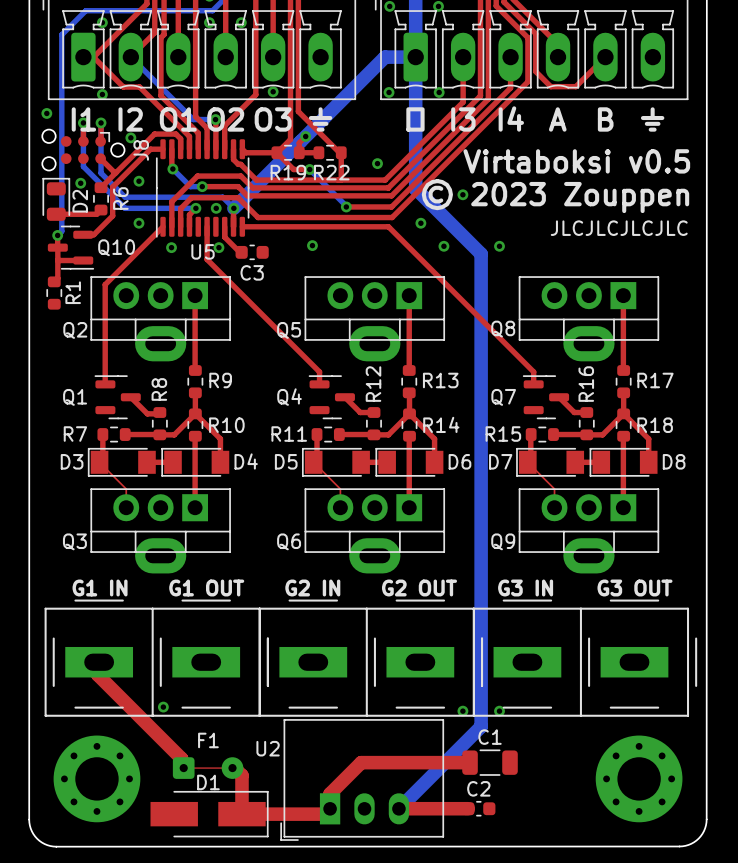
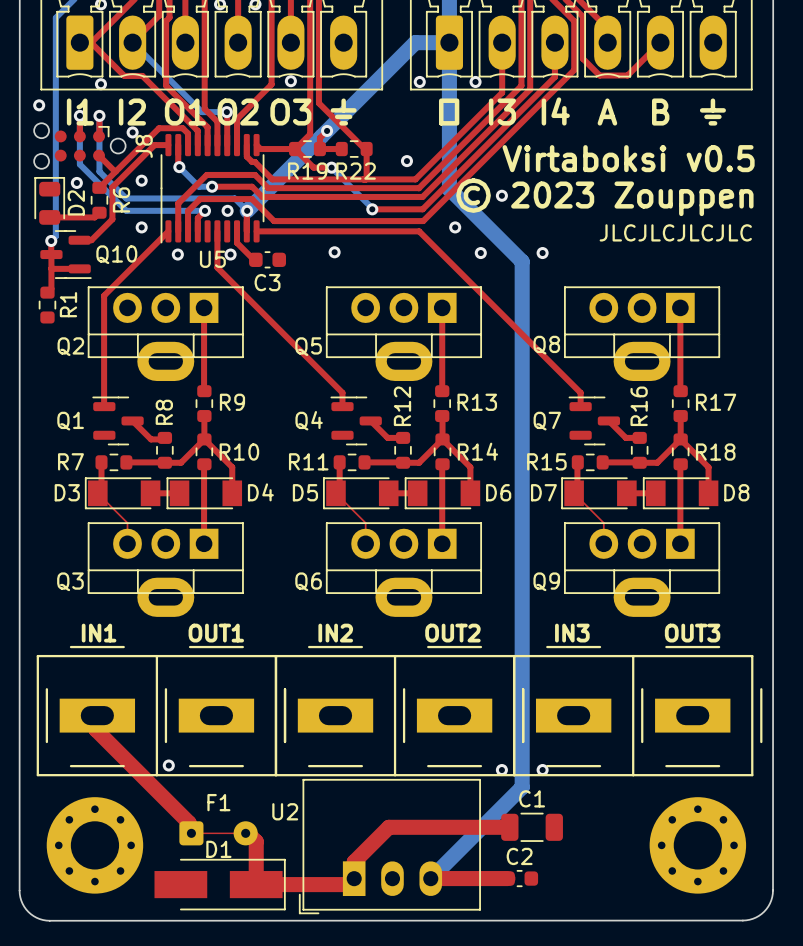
text: G1 IN (100, 587) -> IN1 (99, 633)
text: G1 OUT (206, 587) -> OUT1 (216, 633)
text: G2 IN (312, 587) -> IN2 (335, 633)
text: G2 OUT (419, 587) -> OUT2 (452, 633)
text: G3 IN (525, 587) -> IN3 (572, 633)
text: G3 OUT (634, 587) -> OUT3 (692, 633)

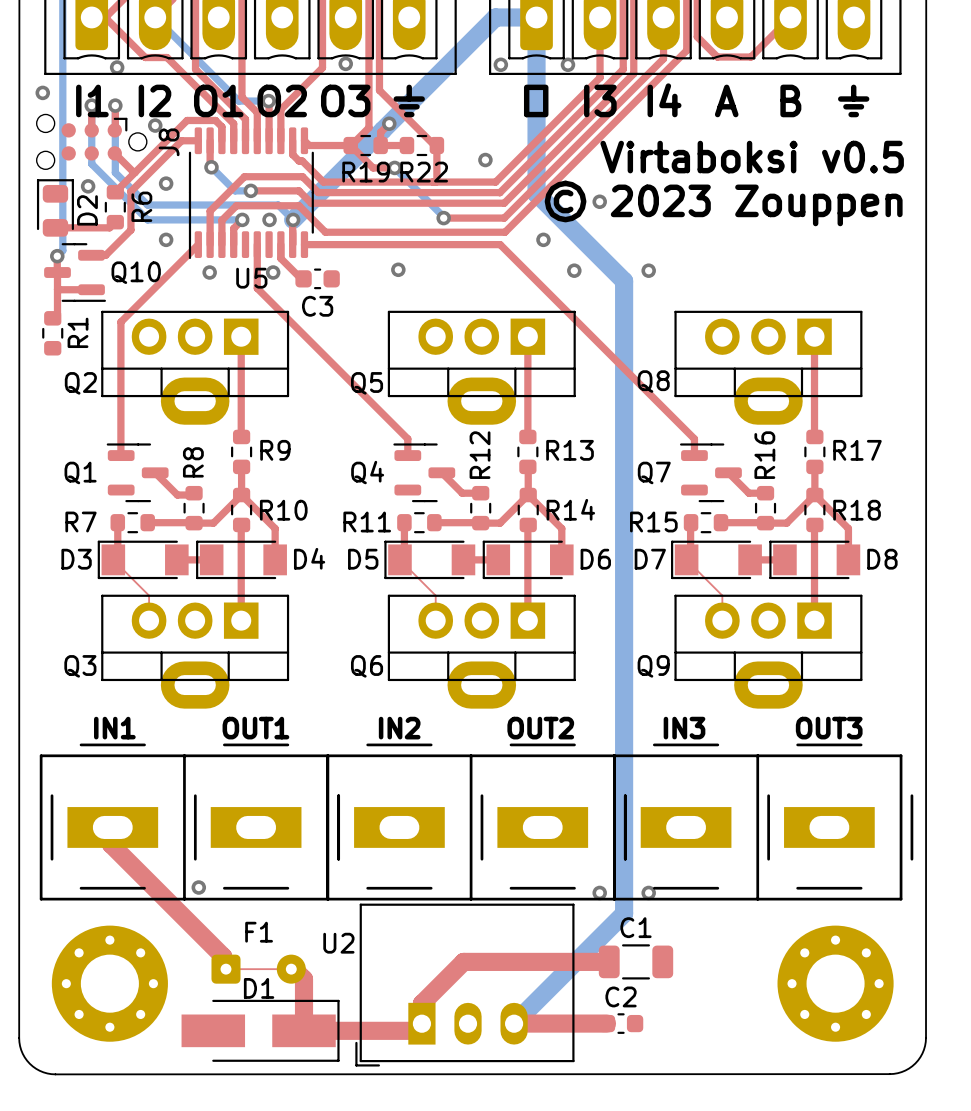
text: JLCJLCJLCJLC (675, 232) -> none

